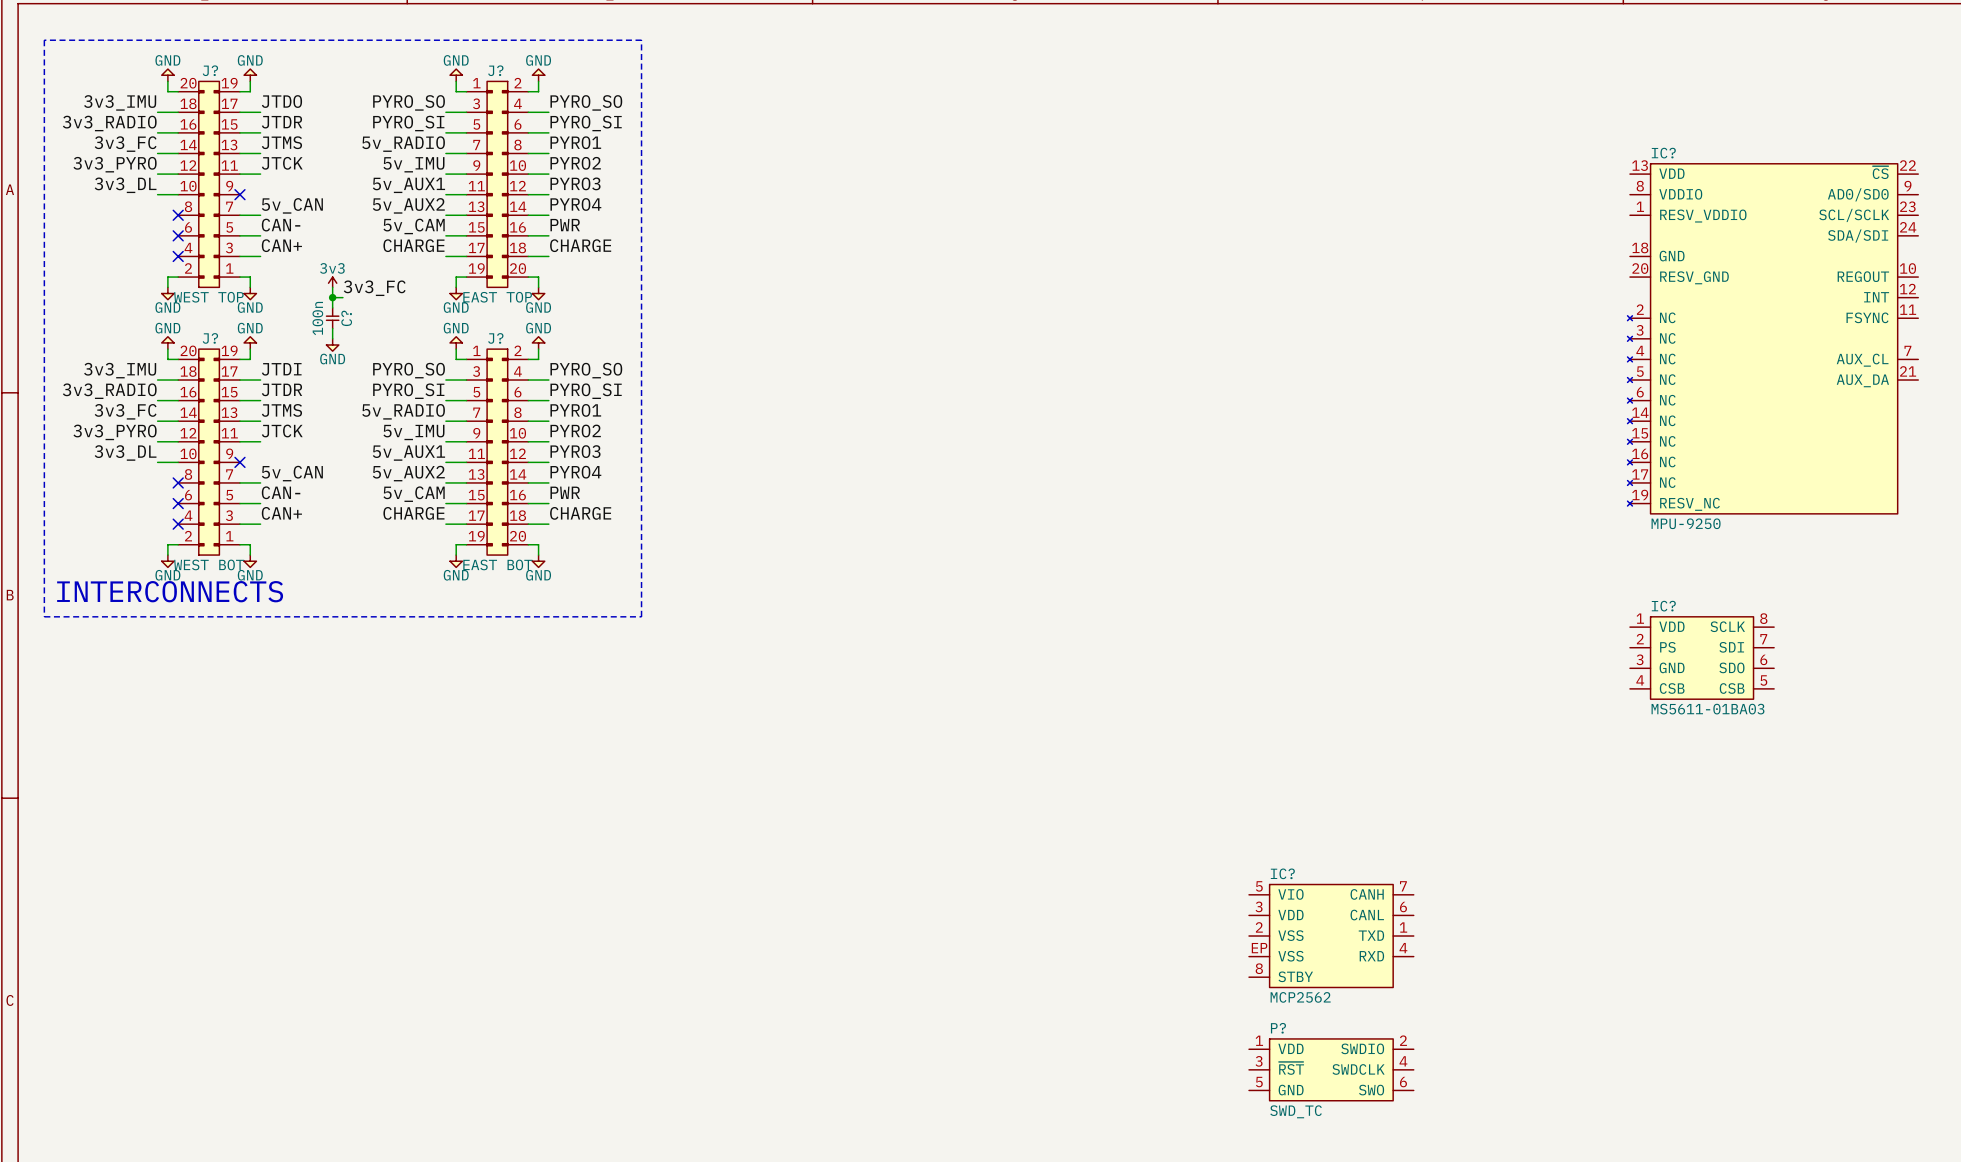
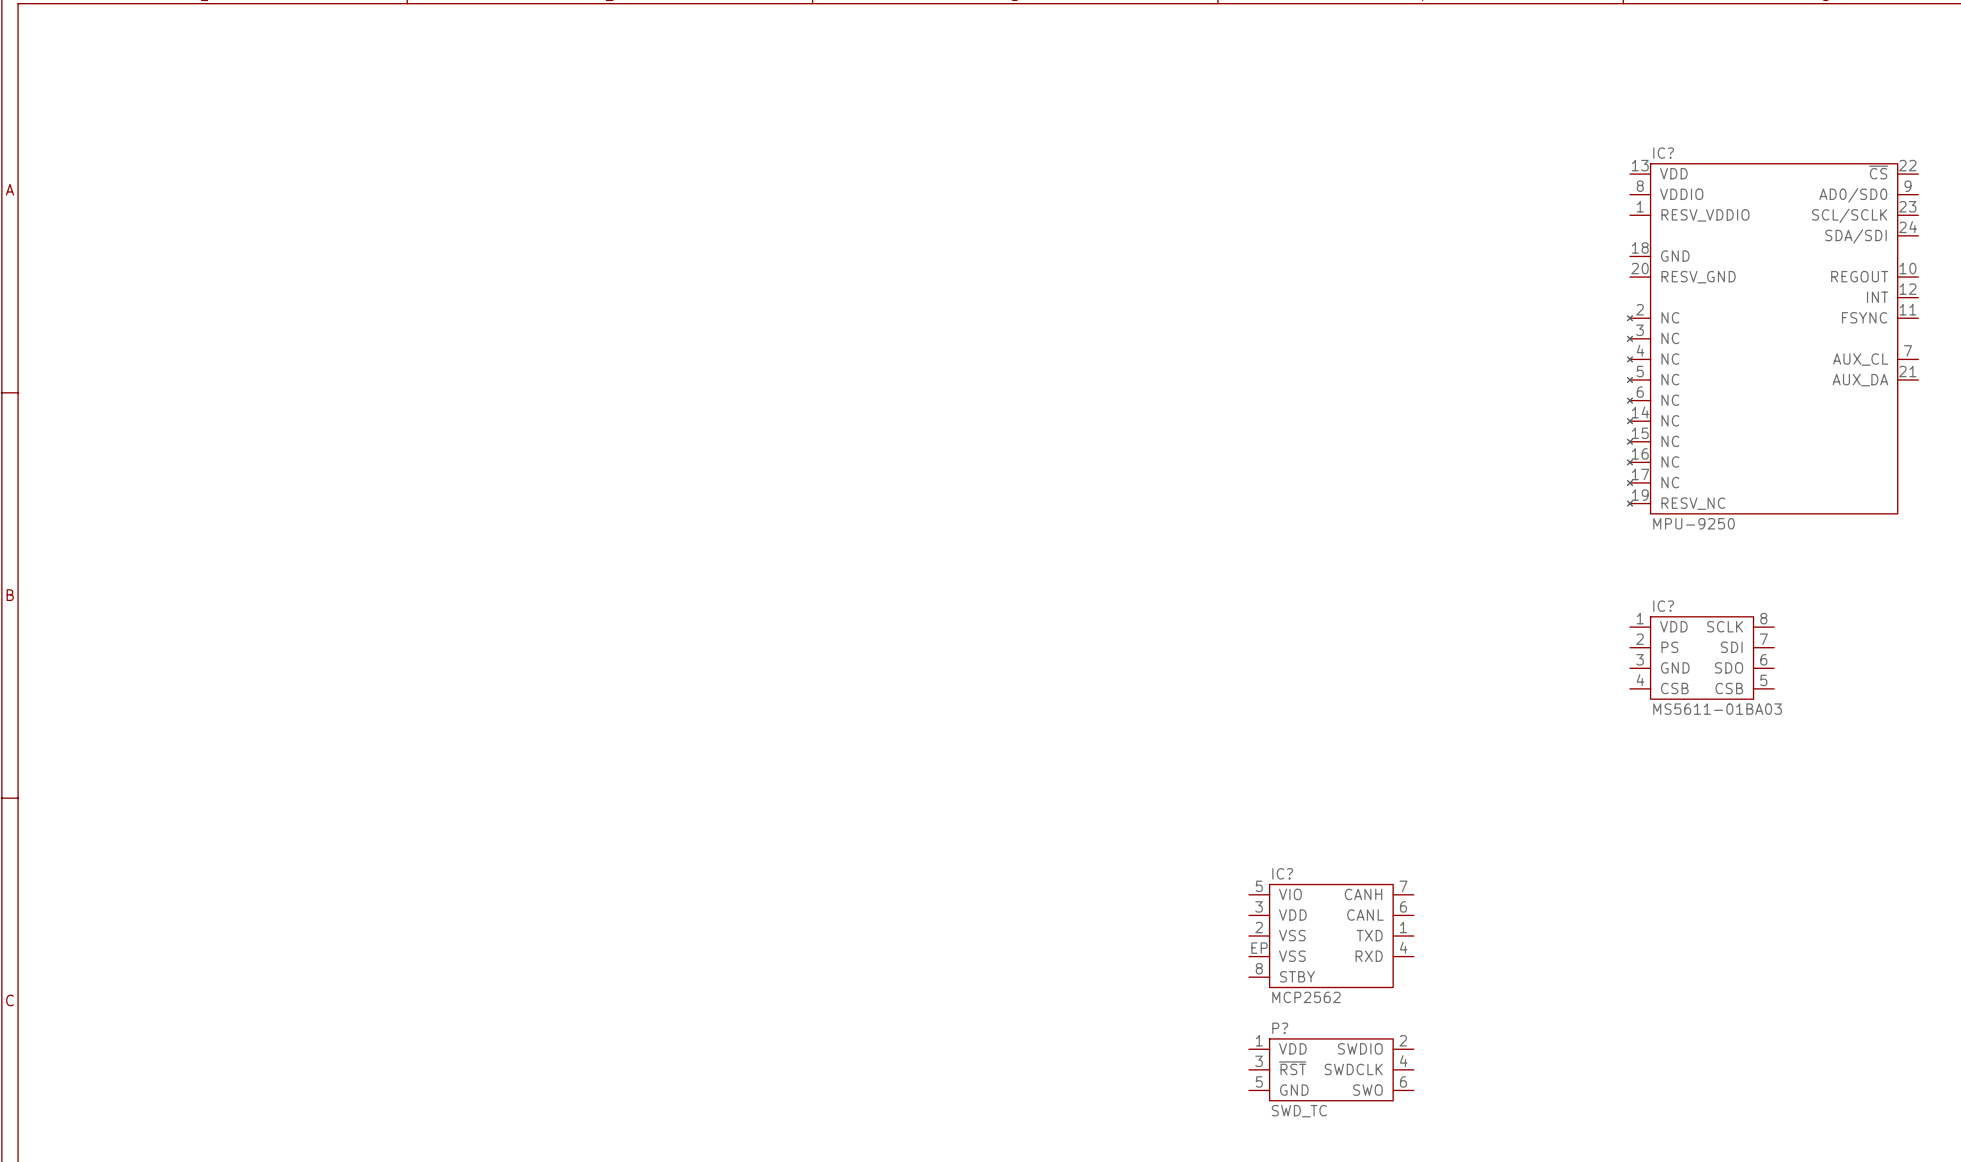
line: (44, 40) (641, 40) (641, 616) (44, 616) (44, 40) -> none
power symbol: GND (167, 75) -> none
power symbol: GND (250, 75) -> none
power symbol: GND (456, 75) -> none
power symbol: GND (538, 75) -> none
wire: (167, 81) (167, 91) (178, 91) -> none
wire: (250, 81) (250, 91) (239, 91) -> none
wire: (456, 81) (456, 91) (466, 91) -> none
wire: (538, 81) (538, 91) (528, 91) -> none
label: JTDO (281, 101) -> none
label: 3v3_IMU (120, 102) -> none
label: PYRO_SO (409, 102) -> none
label: PYRO_SO (586, 102) -> none
wire: (157, 112) (178, 112) -> none
wire: (239, 112) (260, 112) -> none
wire: (445, 112) (466, 112) -> none
wire: (528, 112) (548, 112) -> none
label: JTDR (282, 122) -> none
label: 3v3_RADIO (109, 123) -> none
label: PYRO_SI (408, 123) -> none
label: PYRO_SI (586, 123) -> none
wire: (157, 132) (178, 132) -> none
wire: (239, 132) (260, 132) -> none
wire: (445, 132) (466, 132) -> none
wire: (528, 132) (548, 132) -> none
label: JTMS (281, 142) -> none
label: PYRO1 (575, 142) -> none
label: 3v3_FC (125, 144) -> none
label: 5v_RADIO (403, 144) -> none
wire: (157, 153) (178, 153) -> none
wire: (239, 153) (260, 153) -> none
wire: (445, 153) (466, 153) -> none
wire: (528, 153) (548, 153) -> none
label: JTCK (282, 163) -> none
label: PYRO2 (575, 163) -> none
label: 3v3_PYRO (115, 164) -> none
label: 5v_IMU (413, 164) -> none
wire: (157, 174) (178, 174) -> none
wire: (239, 174) (260, 174) -> none
wire: (445, 174) (466, 174) -> none
wire: (528, 174) (548, 174) -> none
label: PYRO3 (575, 183) -> none
J?: WEST TOP (209, 184) -> none
J?: EAST TOP (497, 184) -> none
label: 3v3_DL (125, 185) -> none
label: 5v_AUX1 (408, 185) -> none
wire: (157, 194) (178, 194) -> none
no-connect mark: (239, 194) -> none
wire: (445, 194) (466, 194) -> none
wire: (528, 194) (548, 194) -> none
label: PYRO4 (575, 204) -> none
label: 5v_CAN (292, 205) -> none
label: 5v_AUX2 (408, 205) -> none
no-connect mark: (178, 215) -> none
wire: (239, 215) (260, 215) -> none
wire: (445, 215) (466, 215) -> none
wire: (528, 215) (548, 215) -> none
label: CAN- (281, 225) -> none
label: PWR (565, 225) -> none
label: 5v_CAM (414, 226) -> none
no-connect mark: (178, 235) -> none
wire: (239, 235) (260, 235) -> none
wire: (445, 235) (466, 235) -> none
wire: (528, 235) (548, 235) -> none
label: CAN+ (281, 245) -> none
label: CHARGE (413, 245) -> none
label: CHARGE (580, 245) -> none
no-connect mark: (178, 256) -> none
wire: (239, 256) (260, 256) -> none
wire: (445, 256) (466, 256) -> none
wire: (528, 256) (548, 256) -> none
wire: (178, 277) (167, 277) (167, 287) -> none
wire: (239, 277) (250, 277) (250, 287) -> none
wire: (466, 277) (456, 277) (456, 287) -> none
wire: (528, 277) (538, 277) (538, 287) -> none
power symbol: 3v3 (332, 282) -> none
wire: (332, 287) (332, 307) -> none
label: 3v3_FC (374, 288) -> none
power symbol: GND (167, 293) -> none
power symbol: GND (250, 293) -> none
power symbol: GND (456, 293) -> none
power symbol: GND (538, 293) -> none
wire: (332, 297) (342, 297) -> none
junction: (332, 297) -> none
C?: 100n (332, 318) -> none
wire: (332, 328) (332, 338) -> none
power symbol: GND (167, 342) -> none
power symbol: GND (250, 342) -> none
power symbol: GND (456, 342) -> none
power symbol: GND (538, 342) -> none
power symbol: GND (332, 345) -> none
wire: (167, 349) (167, 359) (178, 359) -> none
wire: (250, 349) (250, 359) (239, 359) -> none
wire: (456, 349) (456, 359) (466, 359) -> none
wire: (538, 349) (538, 359) (528, 359) -> none
label: JTDI (281, 369) -> none
label: 3v3_IMU (120, 370) -> none
label: PYRO_SO (409, 370) -> none
label: PYRO_SO (586, 370) -> none
wire: (157, 380) (178, 380) -> none
wire: (239, 380) (260, 380) -> none
wire: (445, 380) (466, 380) -> none
wire: (528, 380) (548, 380) -> none
label: JTDR (282, 389) -> none
label: 3v3_RADIO (109, 391) -> none
label: PYRO_SI (408, 391) -> none
label: PYRO_SI (586, 391) -> none
wire: (157, 400) (178, 400) -> none
wire: (239, 400) (260, 400) -> none
wire: (445, 400) (466, 400) -> none
wire: (528, 400) (548, 400) -> none
label: JTMS (281, 410) -> none
label: PYRO1 (575, 410) -> none
label: 3v3_FC (125, 411) -> none
label: 5v_RADIO (403, 411) -> none
wire: (157, 421) (178, 421) -> none
wire: (239, 421) (260, 421) -> none
wire: (445, 421) (466, 421) -> none
wire: (528, 421) (548, 421) -> none
label: JTCK (282, 431) -> none
label: PYRO2 (575, 431) -> none
label: 3v3_PYRO (115, 432) -> none
label: 5v_IMU (413, 432) -> none
wire: (157, 441) (178, 441) -> none
wire: (239, 441) (260, 441) -> none
wire: (445, 441) (466, 441) -> none
wire: (528, 441) (548, 441) -> none
label: PYRO3 (575, 451) -> none
label: 3v3_DL (125, 452) -> none
J?: WEST BOT (209, 452) -> none
J?: EAST BOT (497, 452) -> none
label: 5v_AUX1 (408, 453) -> none
wire: (157, 462) (178, 462) -> none
no-connect mark: (239, 462) -> none
wire: (445, 462) (466, 462) -> none
wire: (528, 462) (548, 462) -> none
label: PYRO4 (575, 472) -> none
label: 5v_CAN (292, 473) -> none
label: 5v_AUX2 (408, 473) -> none
no-connect mark: (178, 482) -> none
wire: (239, 482) (260, 482) -> none
wire: (445, 482) (466, 482) -> none
wire: (528, 482) (548, 482) -> none
label: CAN- (281, 492) -> none
label: PWR (565, 492) -> none
label: 5v_CAM (414, 494) -> none
no-connect mark: (178, 503) -> none
wire: (239, 503) (260, 503) -> none
wire: (445, 503) (466, 503) -> none
wire: (528, 503) (548, 503) -> none
label: CAN+ (281, 513) -> none
label: CHARGE (413, 513) -> none
label: CHARGE (580, 513) -> none
no-connect mark: (178, 524) -> none
wire: (239, 524) (260, 524) -> none
wire: (445, 524) (466, 524) -> none
wire: (528, 524) (548, 524) -> none
wire: (178, 544) (167, 544) (167, 555) -> none
wire: (239, 544) (250, 544) (250, 555) -> none
wire: (466, 544) (456, 544) (456, 555) -> none
wire: (528, 544) (538, 544) (538, 555) -> none
power symbol: GND (167, 561) -> none
power symbol: GND (250, 561) -> none
power symbol: GND (456, 561) -> none
power symbol: GND (538, 561) -> none
text: INTERCONNECTS (170, 591) -> none

